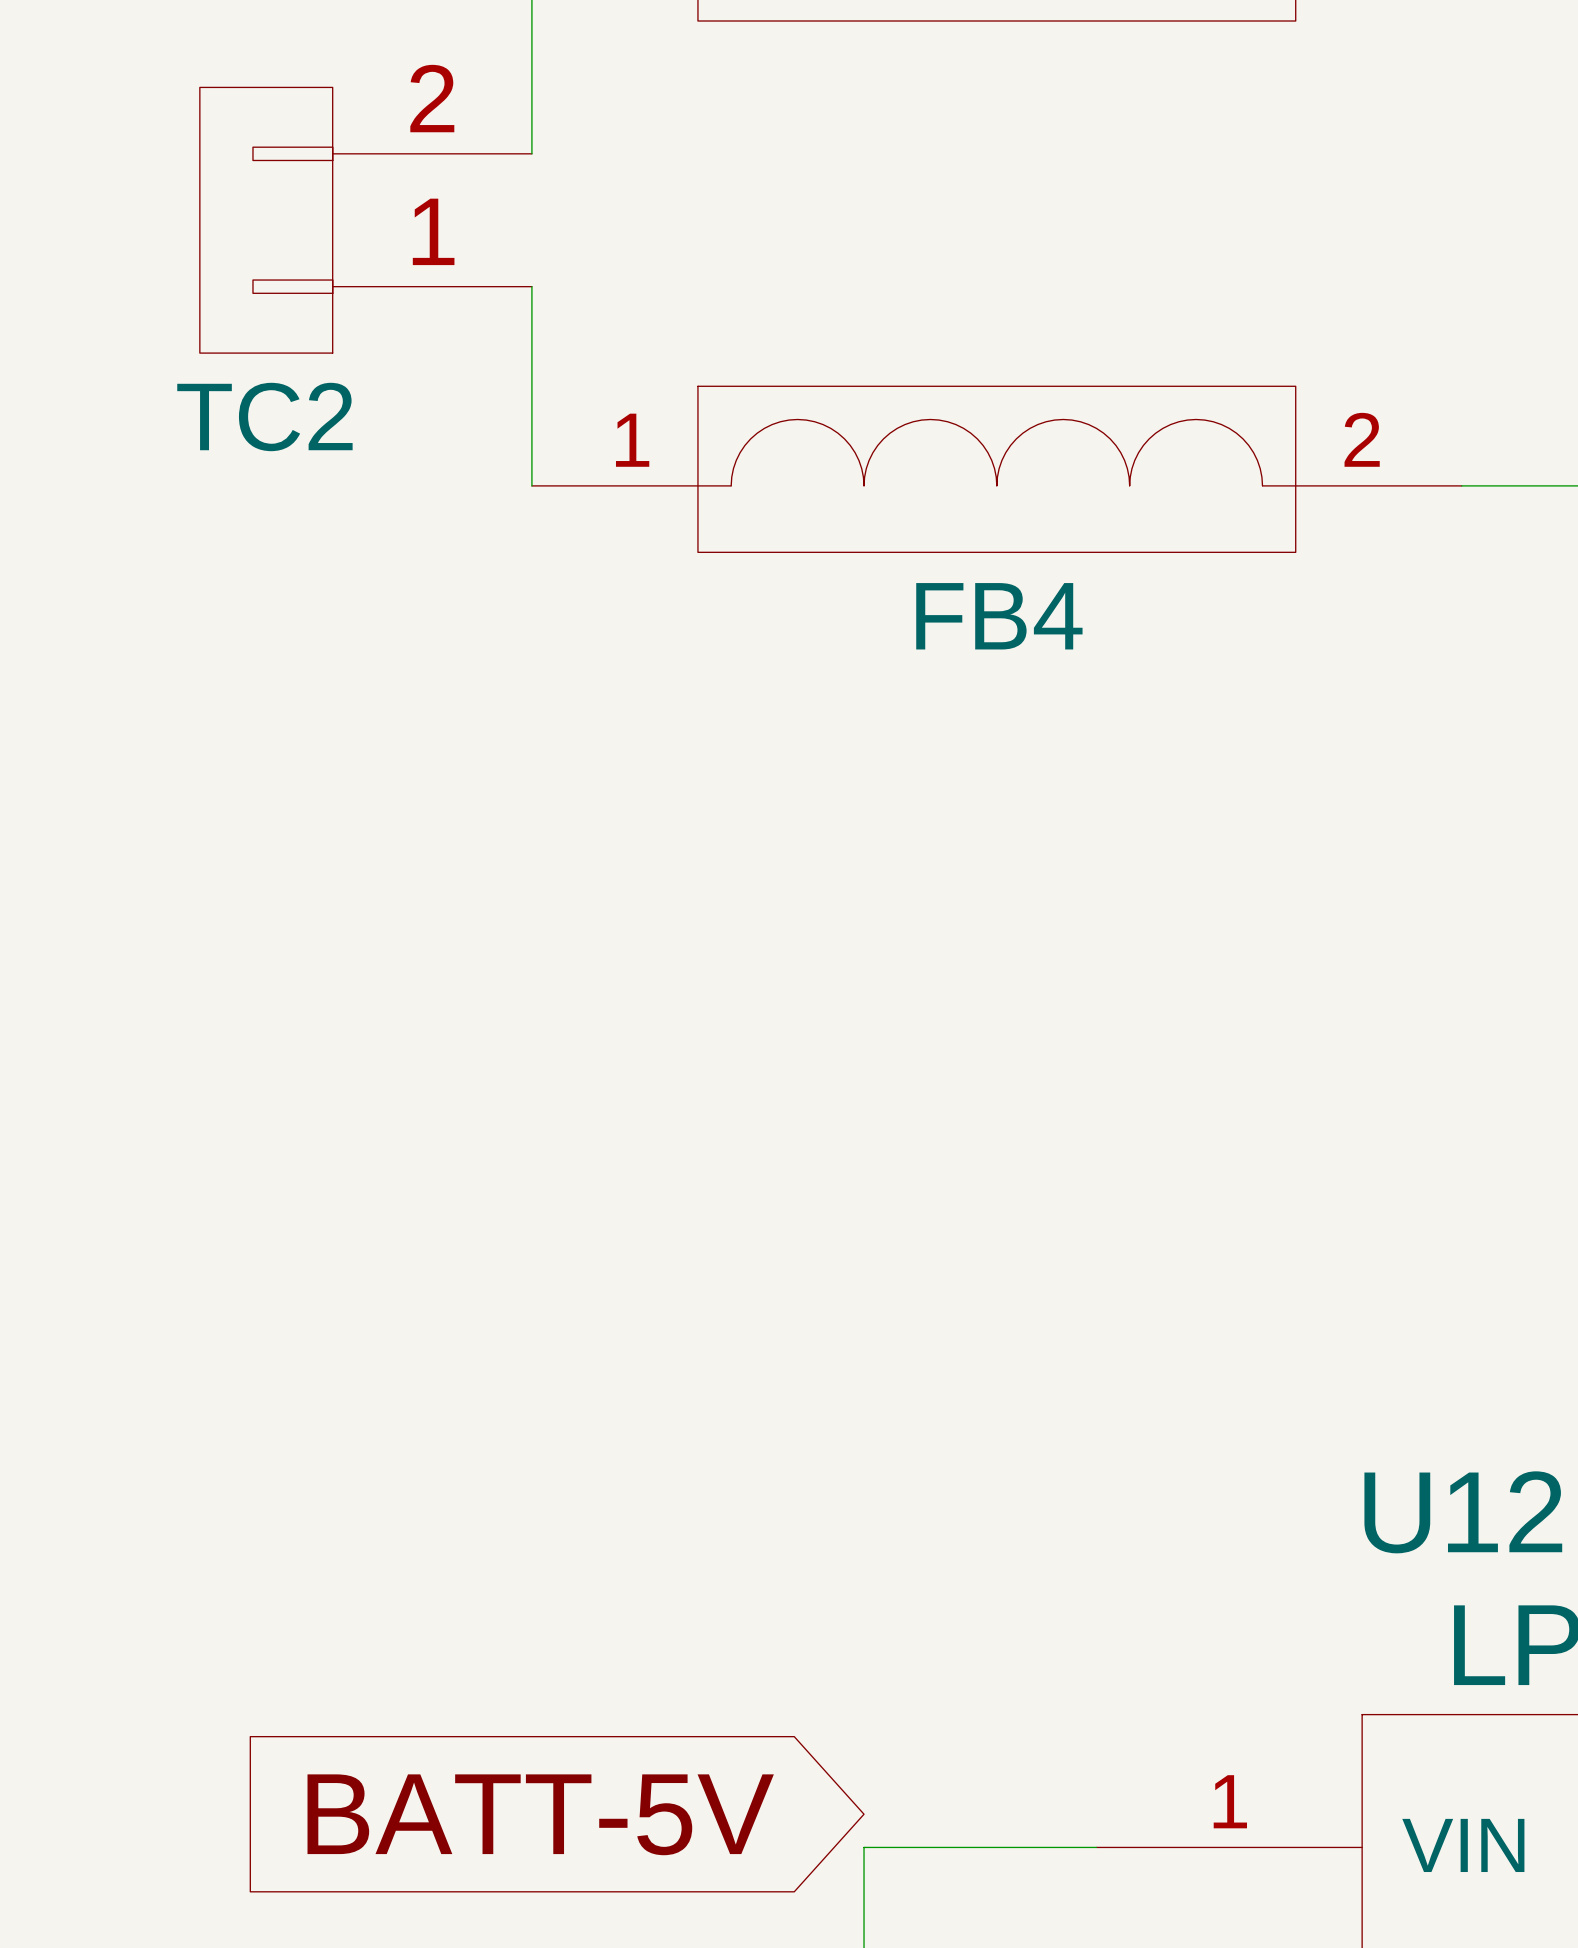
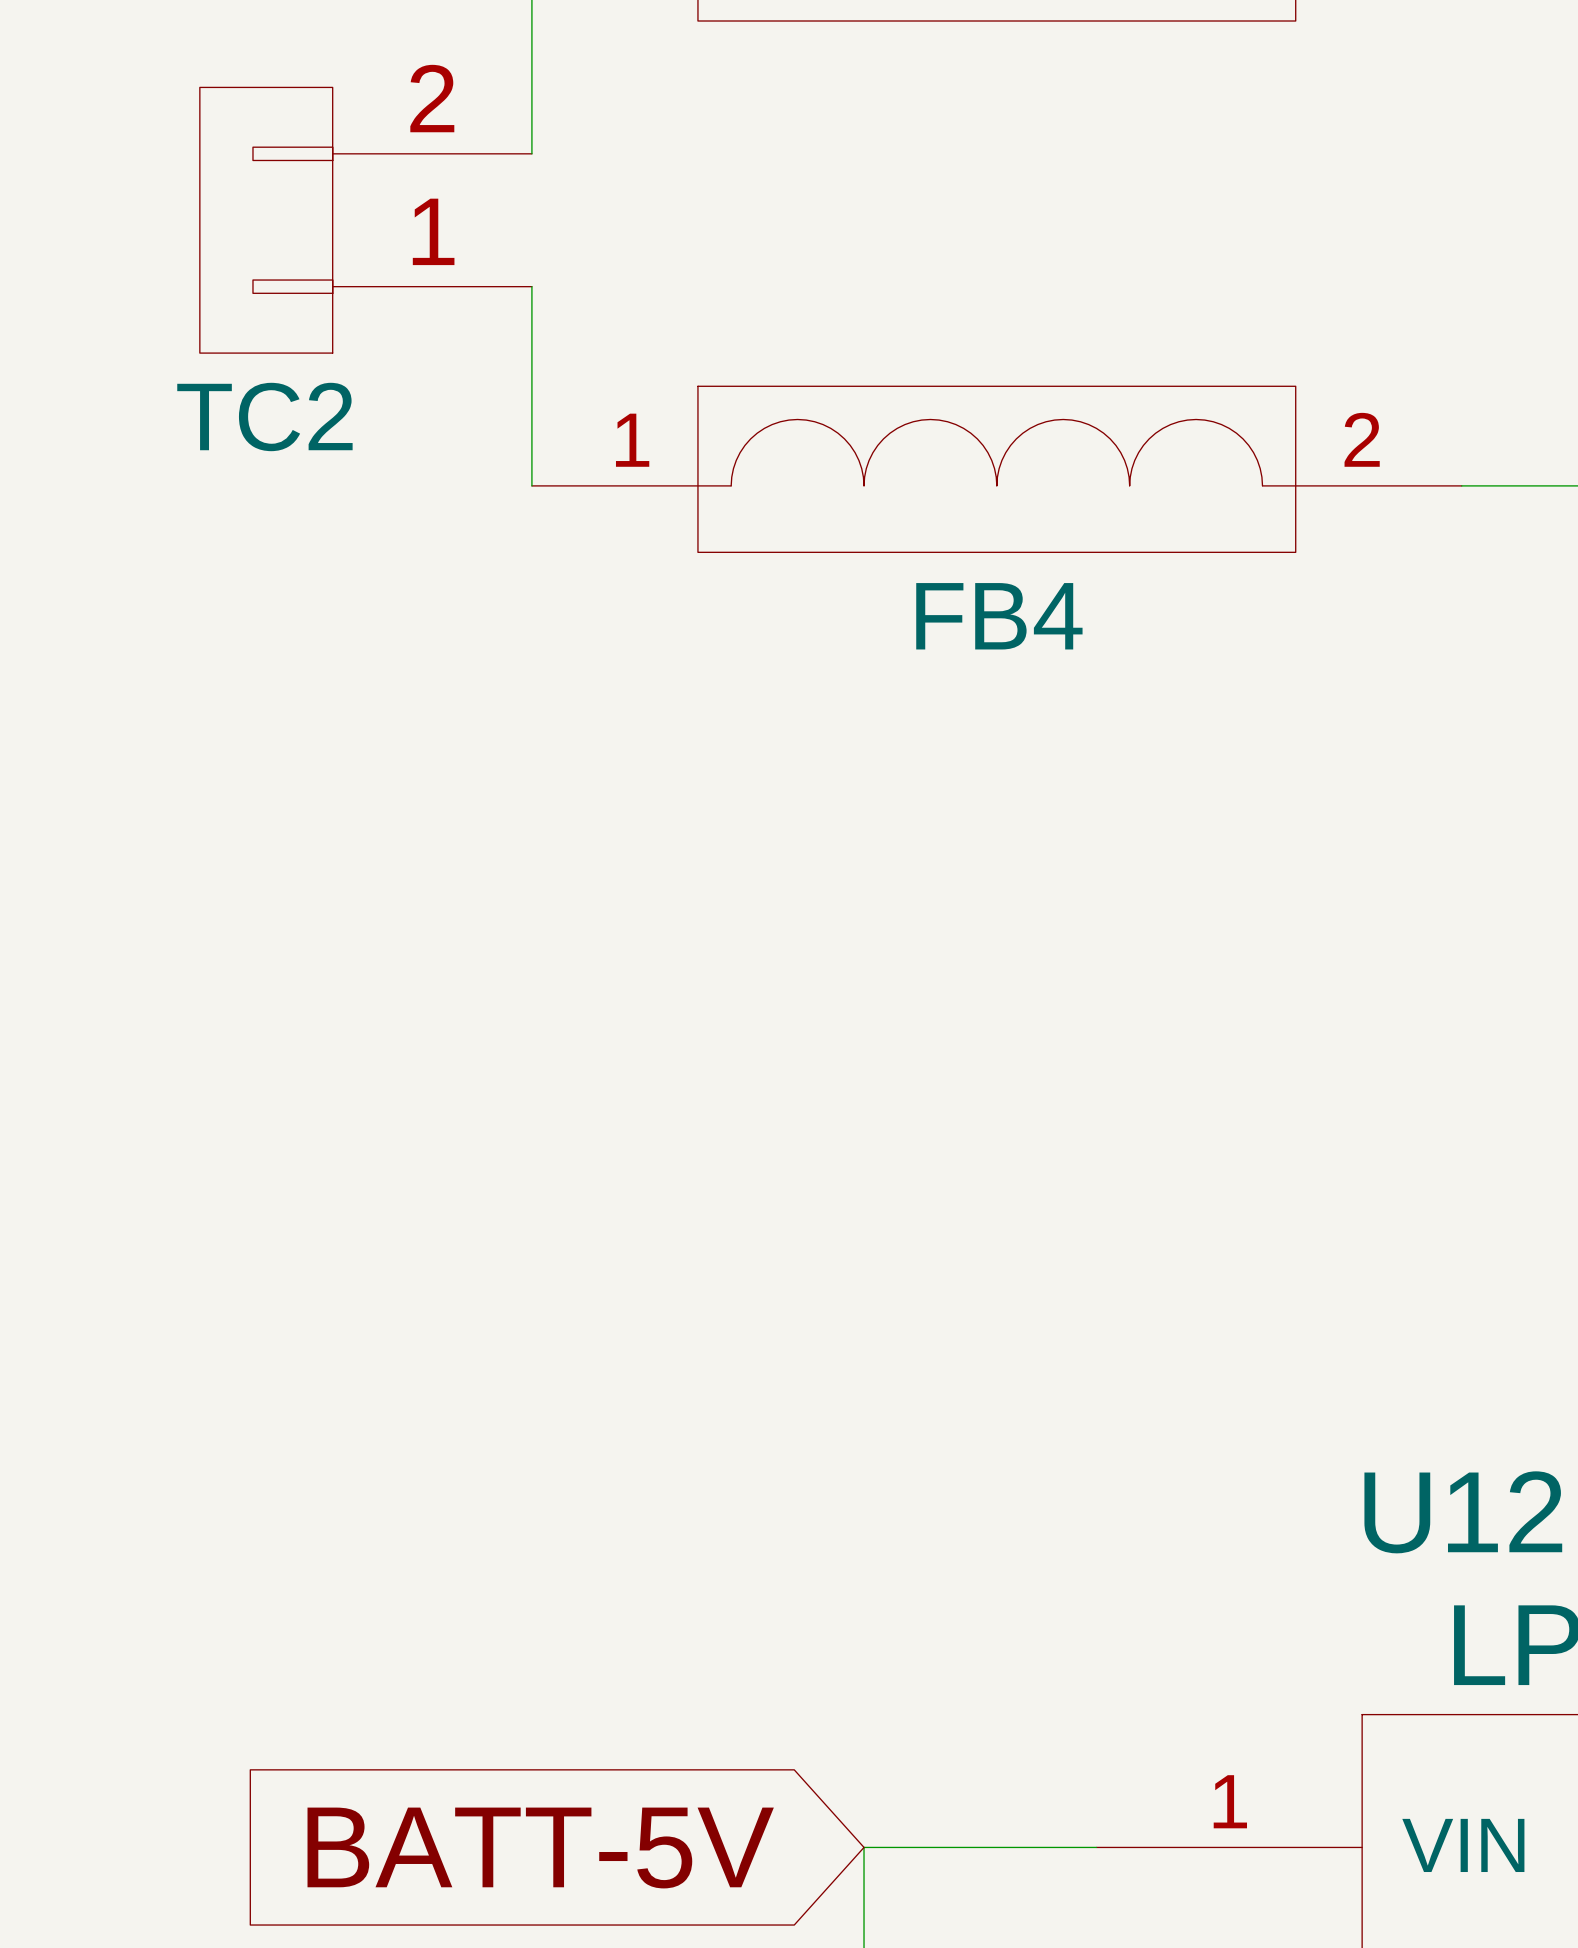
global label position: BATT-5V (540, 1814) -> BATT-5V (540, 1848)

